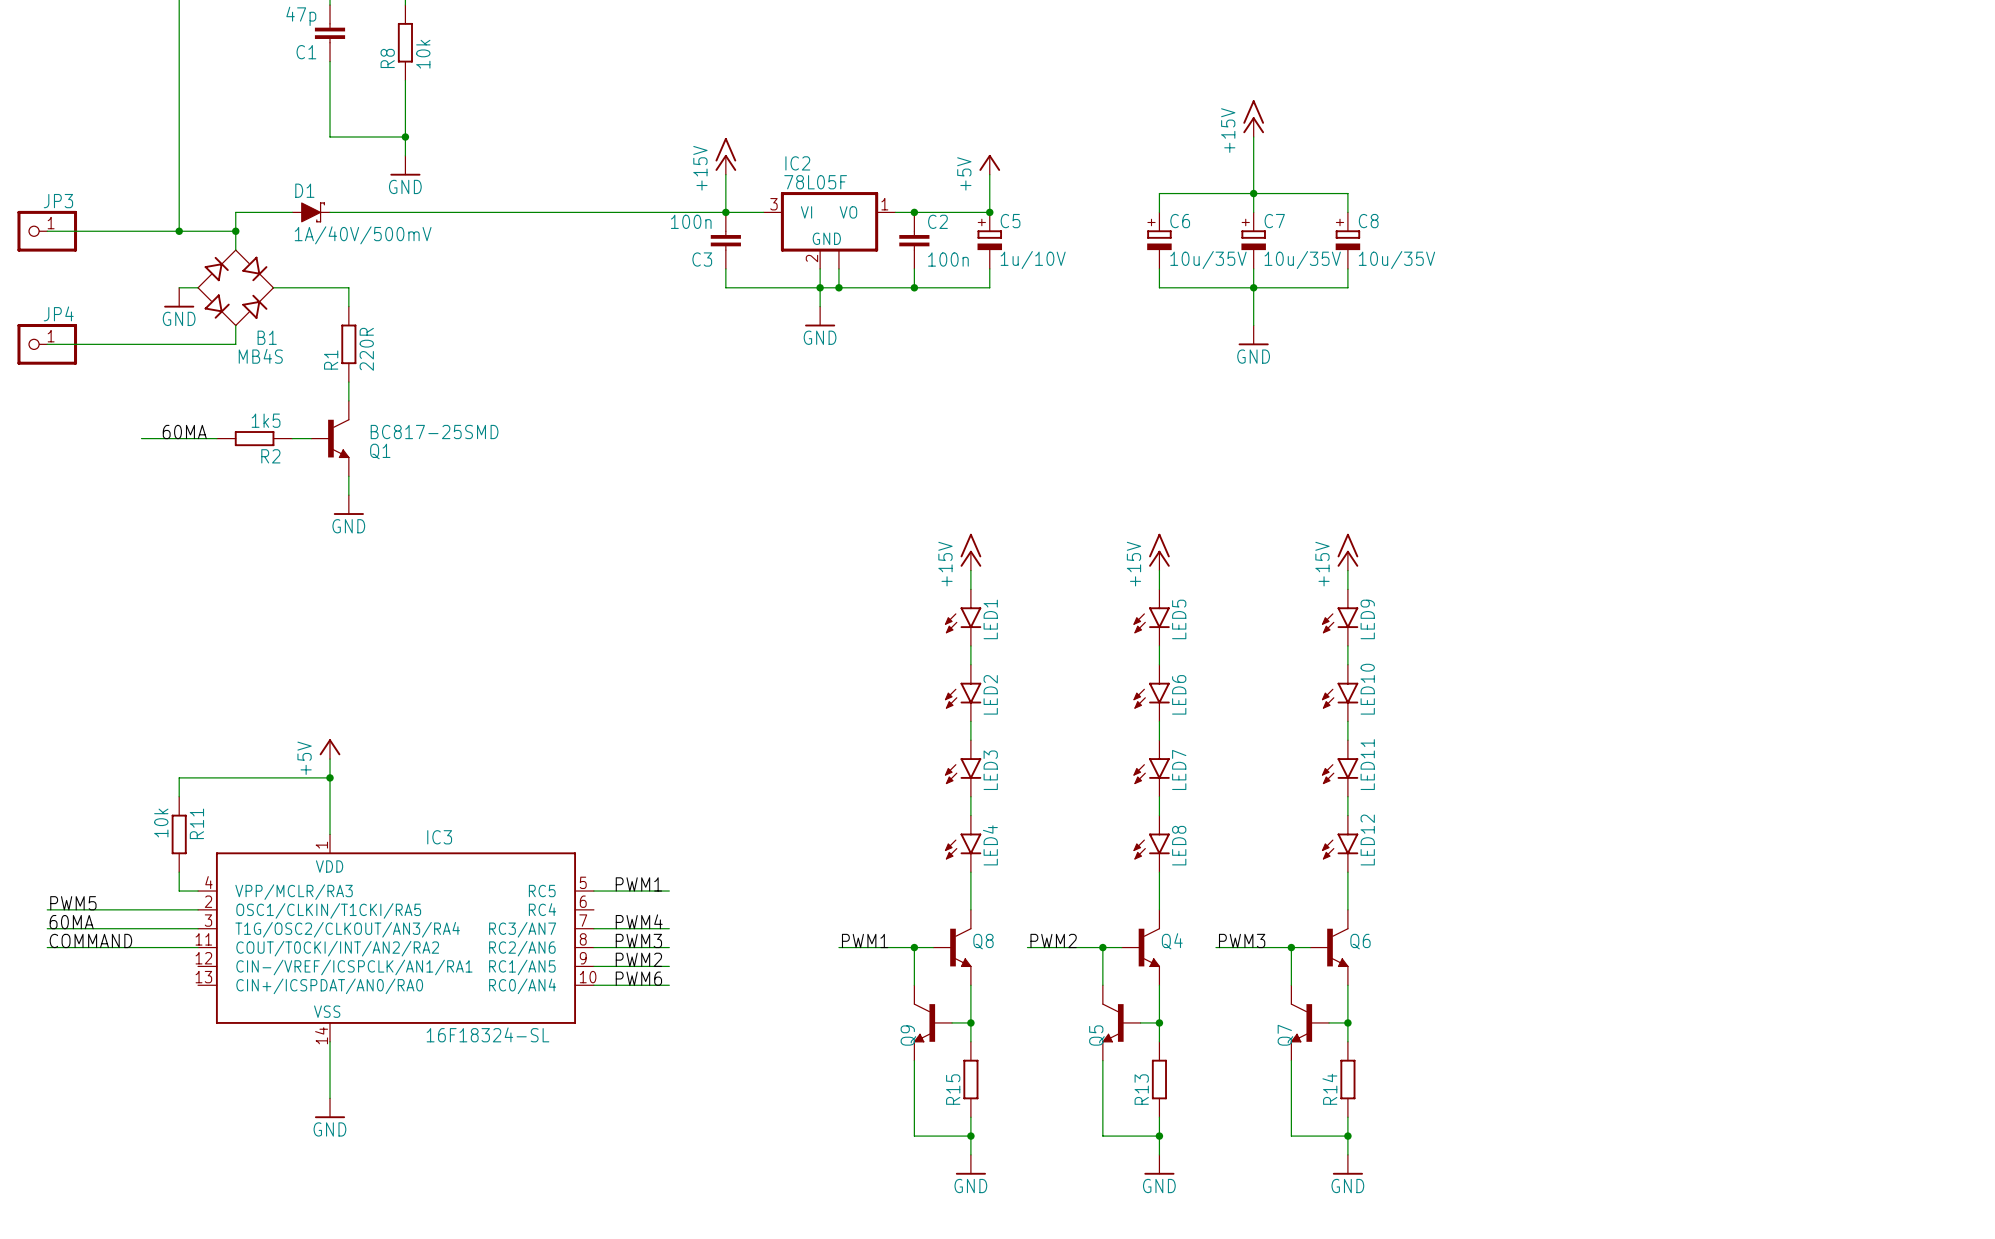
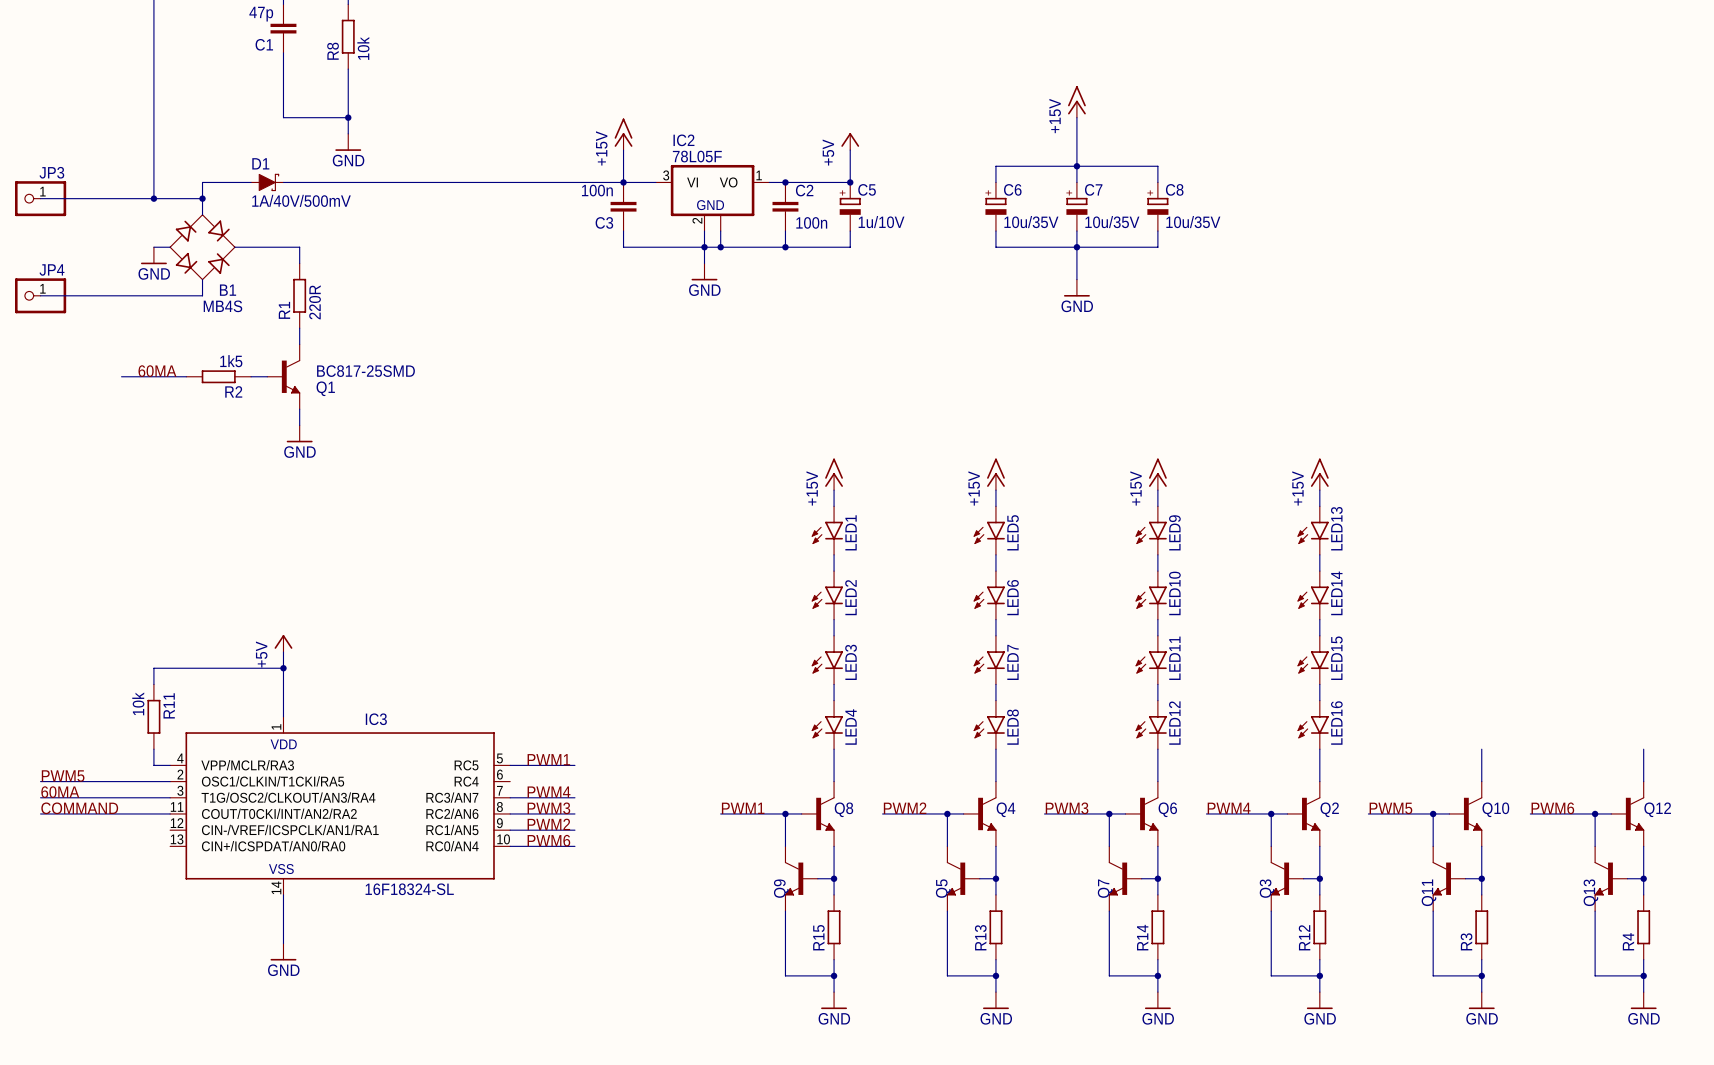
power symbol: none -> +15V (1319, 474)
wire: none -> (1319, 490) (1319, 506)
LED13: none -> (1313, 530)
wire: none -> (1319, 554) (1319, 571)
LED14: none -> (1313, 595)
wire: none -> (1319, 619) (1319, 635)
LED15: none -> (1313, 660)
wire: none -> (1319, 684) (1319, 700)
LED16: none -> (1313, 724)
wire: none -> (1319, 749) (1319, 781)
wire: none -> (1481, 749) (1481, 781)
wire: none -> (1643, 749) (1643, 781)
label: none -> PWM4 (1229, 808)
label: none -> PWM5 (1390, 808)
label: none -> PWM6 (1552, 808)
wire: none -> (1206, 813) (1287, 813)
wire: none -> (1271, 813) (1271, 846)
junction: none -> (1271, 813)
Q2: none -> (1303, 813)
wire: none -> (1368, 813) (1449, 813)
wire: none -> (1433, 813) (1433, 846)
junction: none -> (1433, 813)
Q10: none -> (1465, 813)
wire: none -> (1530, 813) (1611, 813)
wire: none -> (1595, 813) (1595, 846)
junction: none -> (1595, 813)
Q12: none -> (1627, 813)
wire: none -> (1319, 846) (1319, 894)
wire: none -> (1481, 846) (1481, 894)
wire: none -> (1643, 846) (1643, 894)
Q3: none -> (1287, 878)
wire: none -> (1303, 878) (1319, 878)
junction: none -> (1319, 878)
Q11: none -> (1449, 878)
wire: none -> (1465, 878) (1481, 878)
junction: none -> (1481, 878)
Q13: none -> (1611, 878)
wire: none -> (1627, 878) (1643, 878)
junction: none -> (1643, 878)
wire: none -> (1271, 911) (1271, 975) (1319, 975)
wire: none -> (1433, 911) (1433, 975) (1481, 975)
wire: none -> (1595, 911) (1595, 975) (1643, 975)
R12: none -> (1319, 927)
R3: none -> (1481, 927)
R4: none -> (1643, 927)
wire: none -> (1319, 959) (1319, 992)
wire: none -> (1481, 959) (1481, 992)
wire: none -> (1643, 959) (1643, 992)
junction: none -> (1319, 975)
junction: none -> (1481, 975)
junction: none -> (1643, 975)
power symbol: none -> GND (1319, 1000)
power symbol: none -> GND (1481, 1000)
power symbol: none -> GND (1643, 1000)

